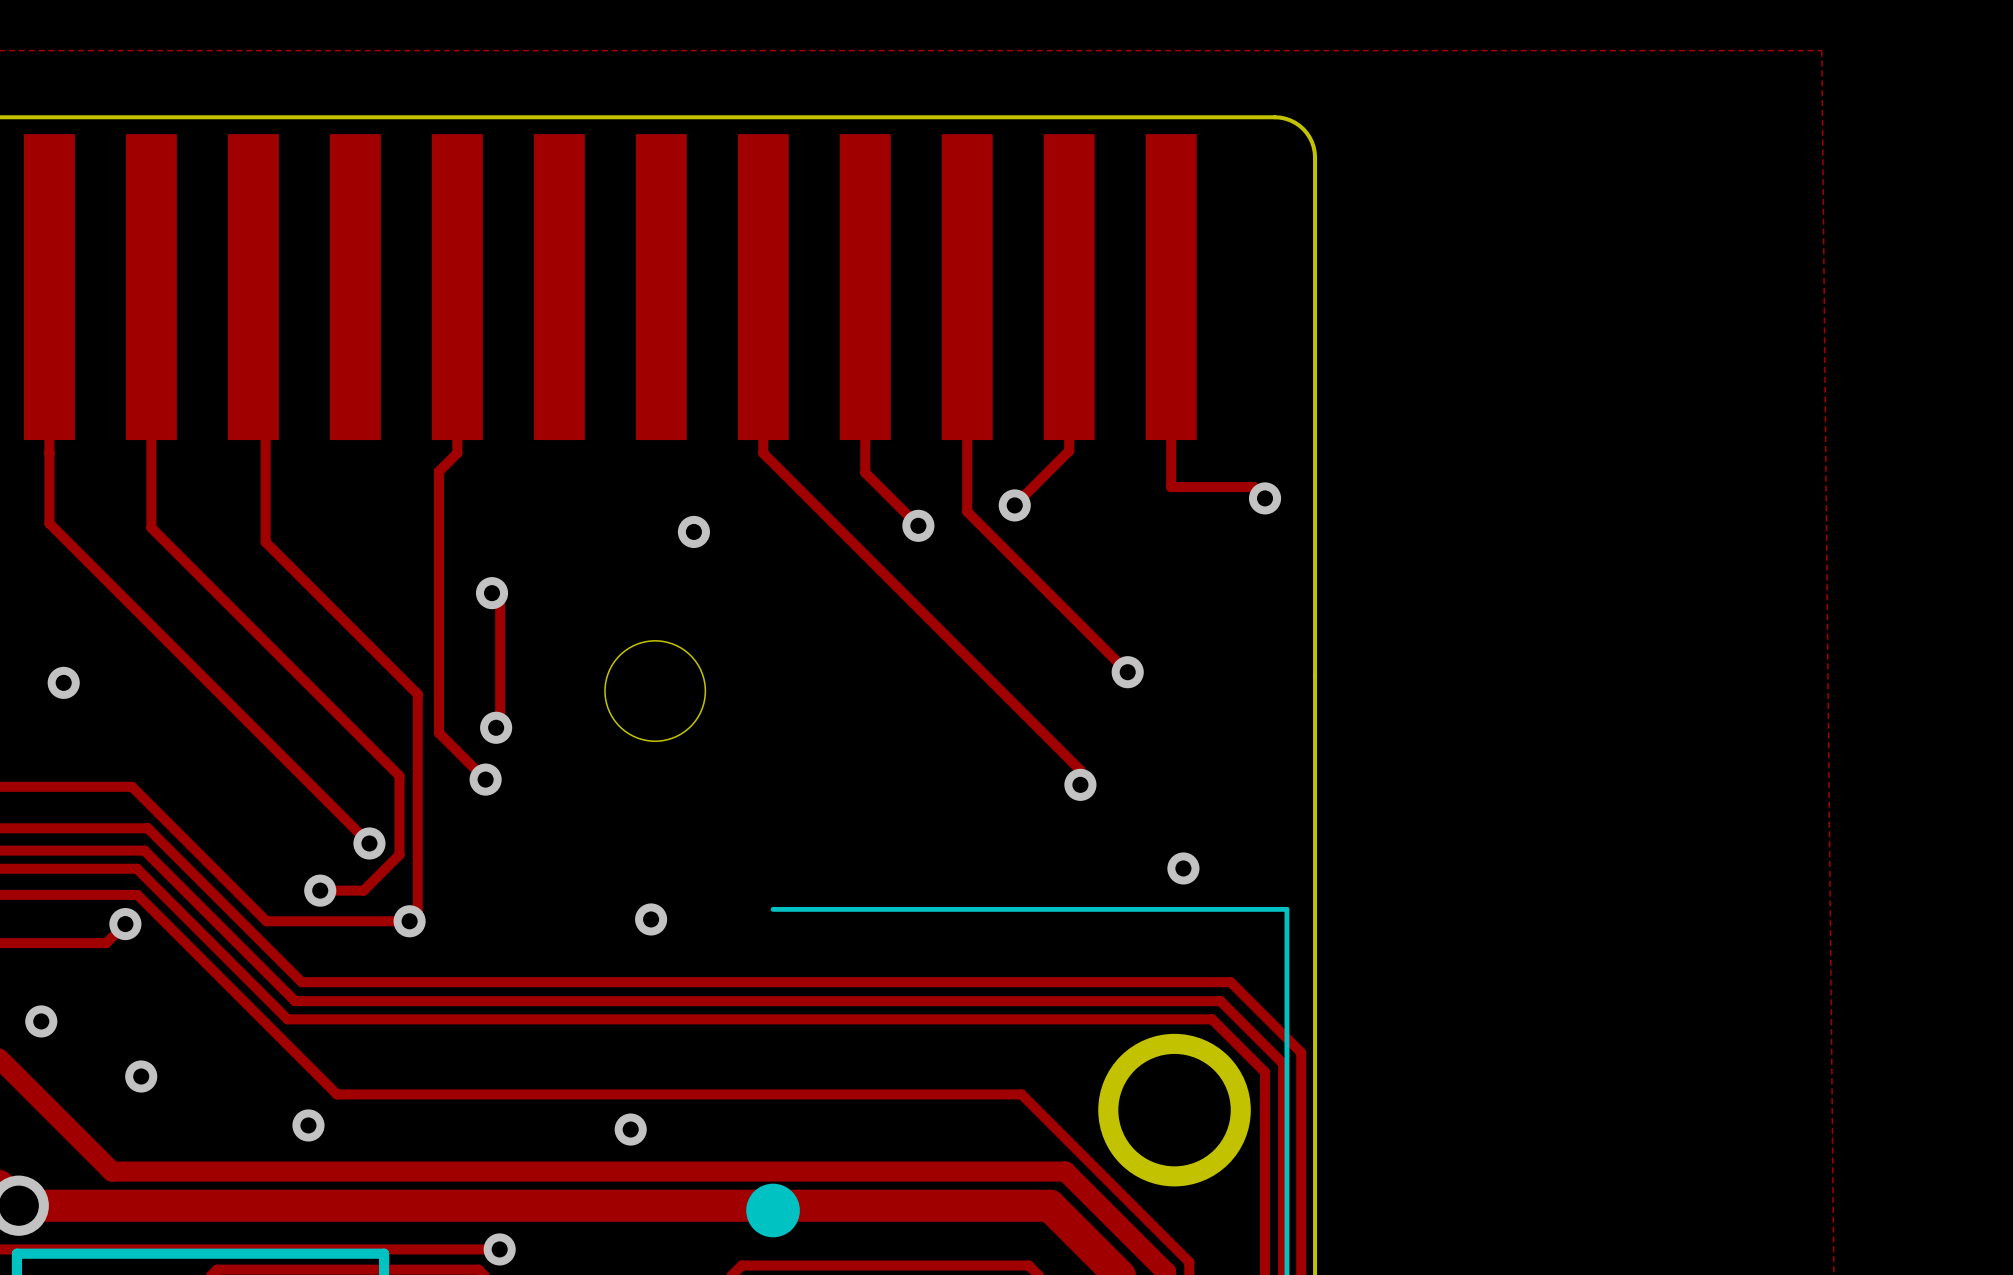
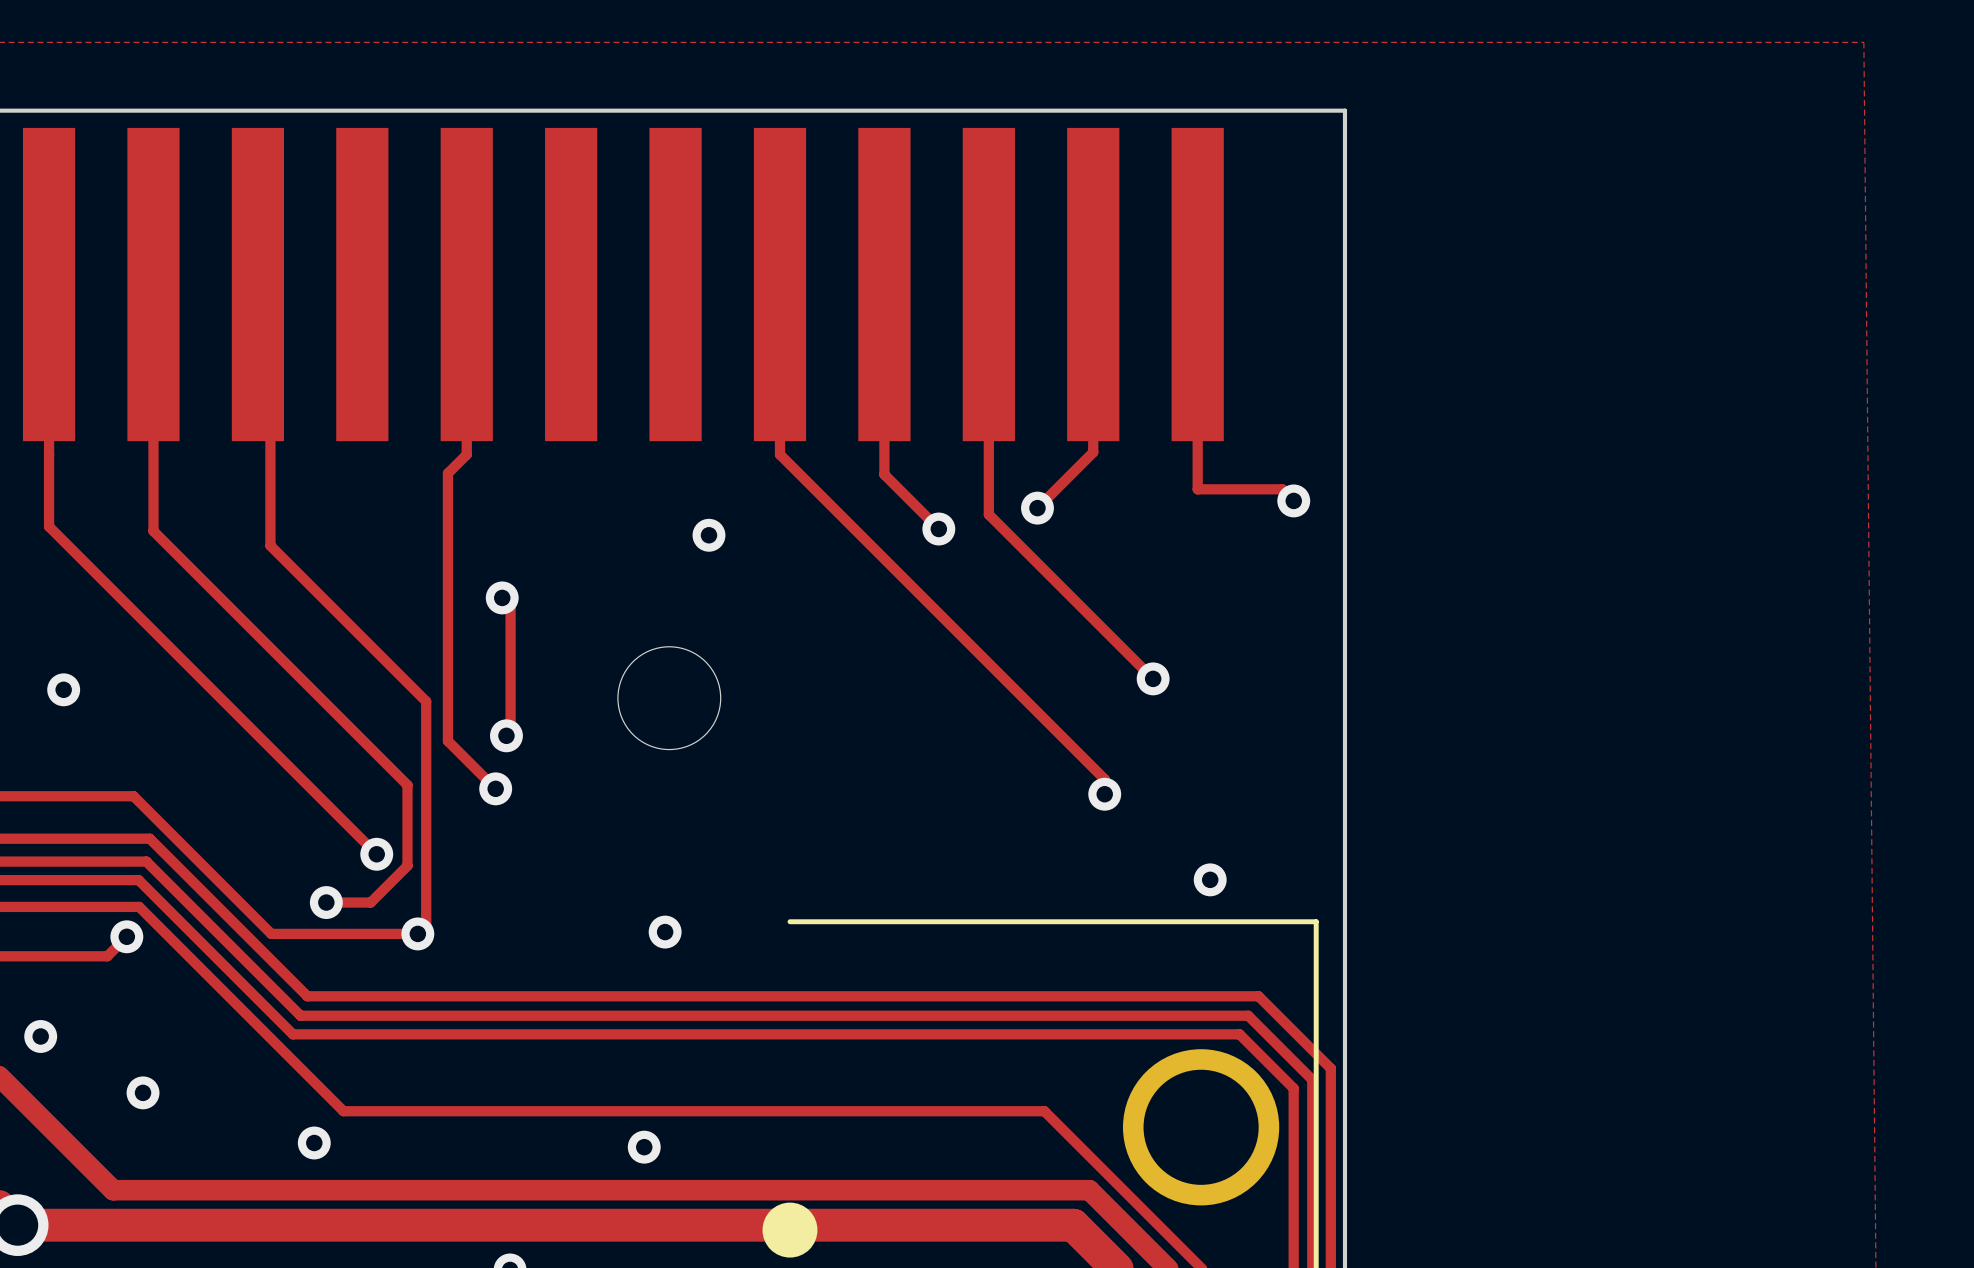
board edge: (1274, 117) (1290, 120) (1303, 129) (1311, 142) (1315, 157) -> (1303, 110) (1344, 110) (1344, 151)

